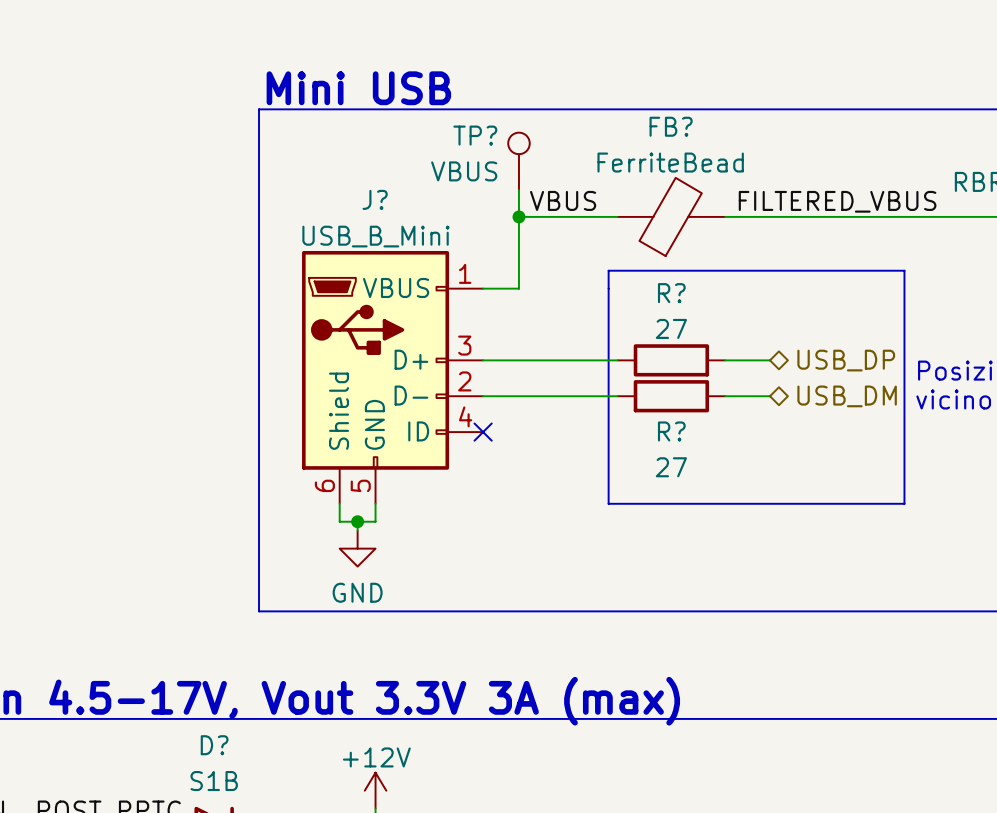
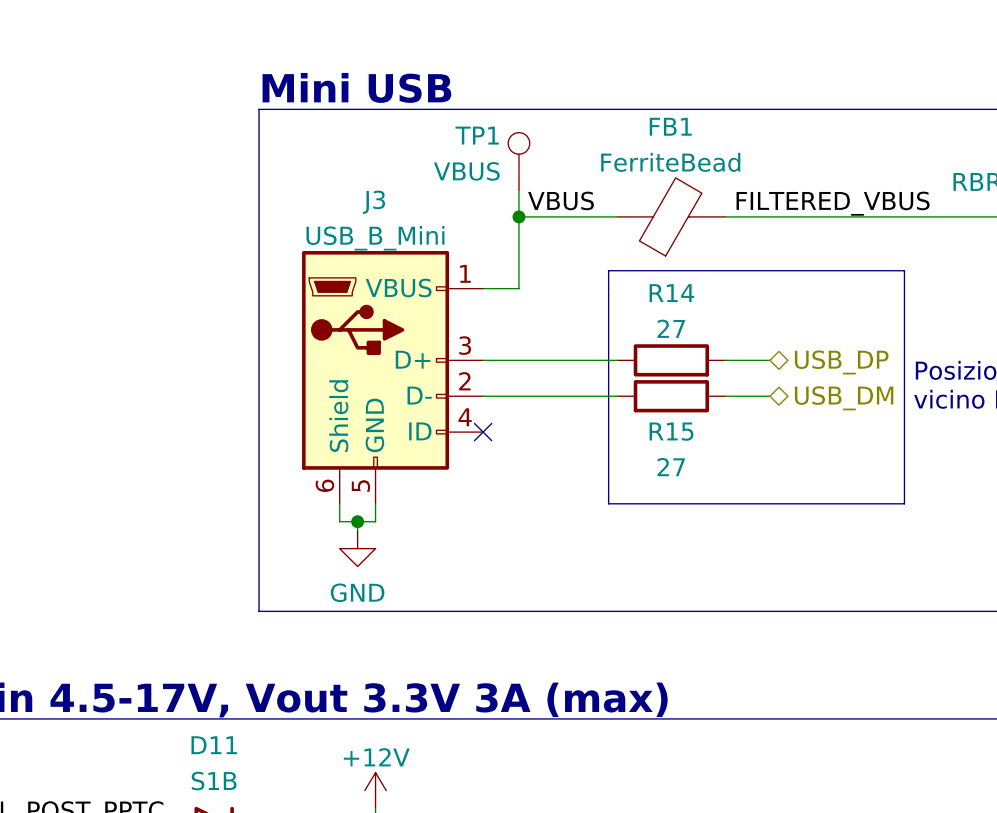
FB? name: FB? (671, 126) -> FB1 (670, 126)
TP? name: TP? (475, 135) -> TP1 (477, 135)
J? name: J? (375, 199) -> J3 (373, 202)
R? name: R? (671, 293) -> R14 (671, 293)
R? name: R? (671, 431) -> R15 (671, 431)
D? name: D? (214, 745) -> D11 (214, 745)

